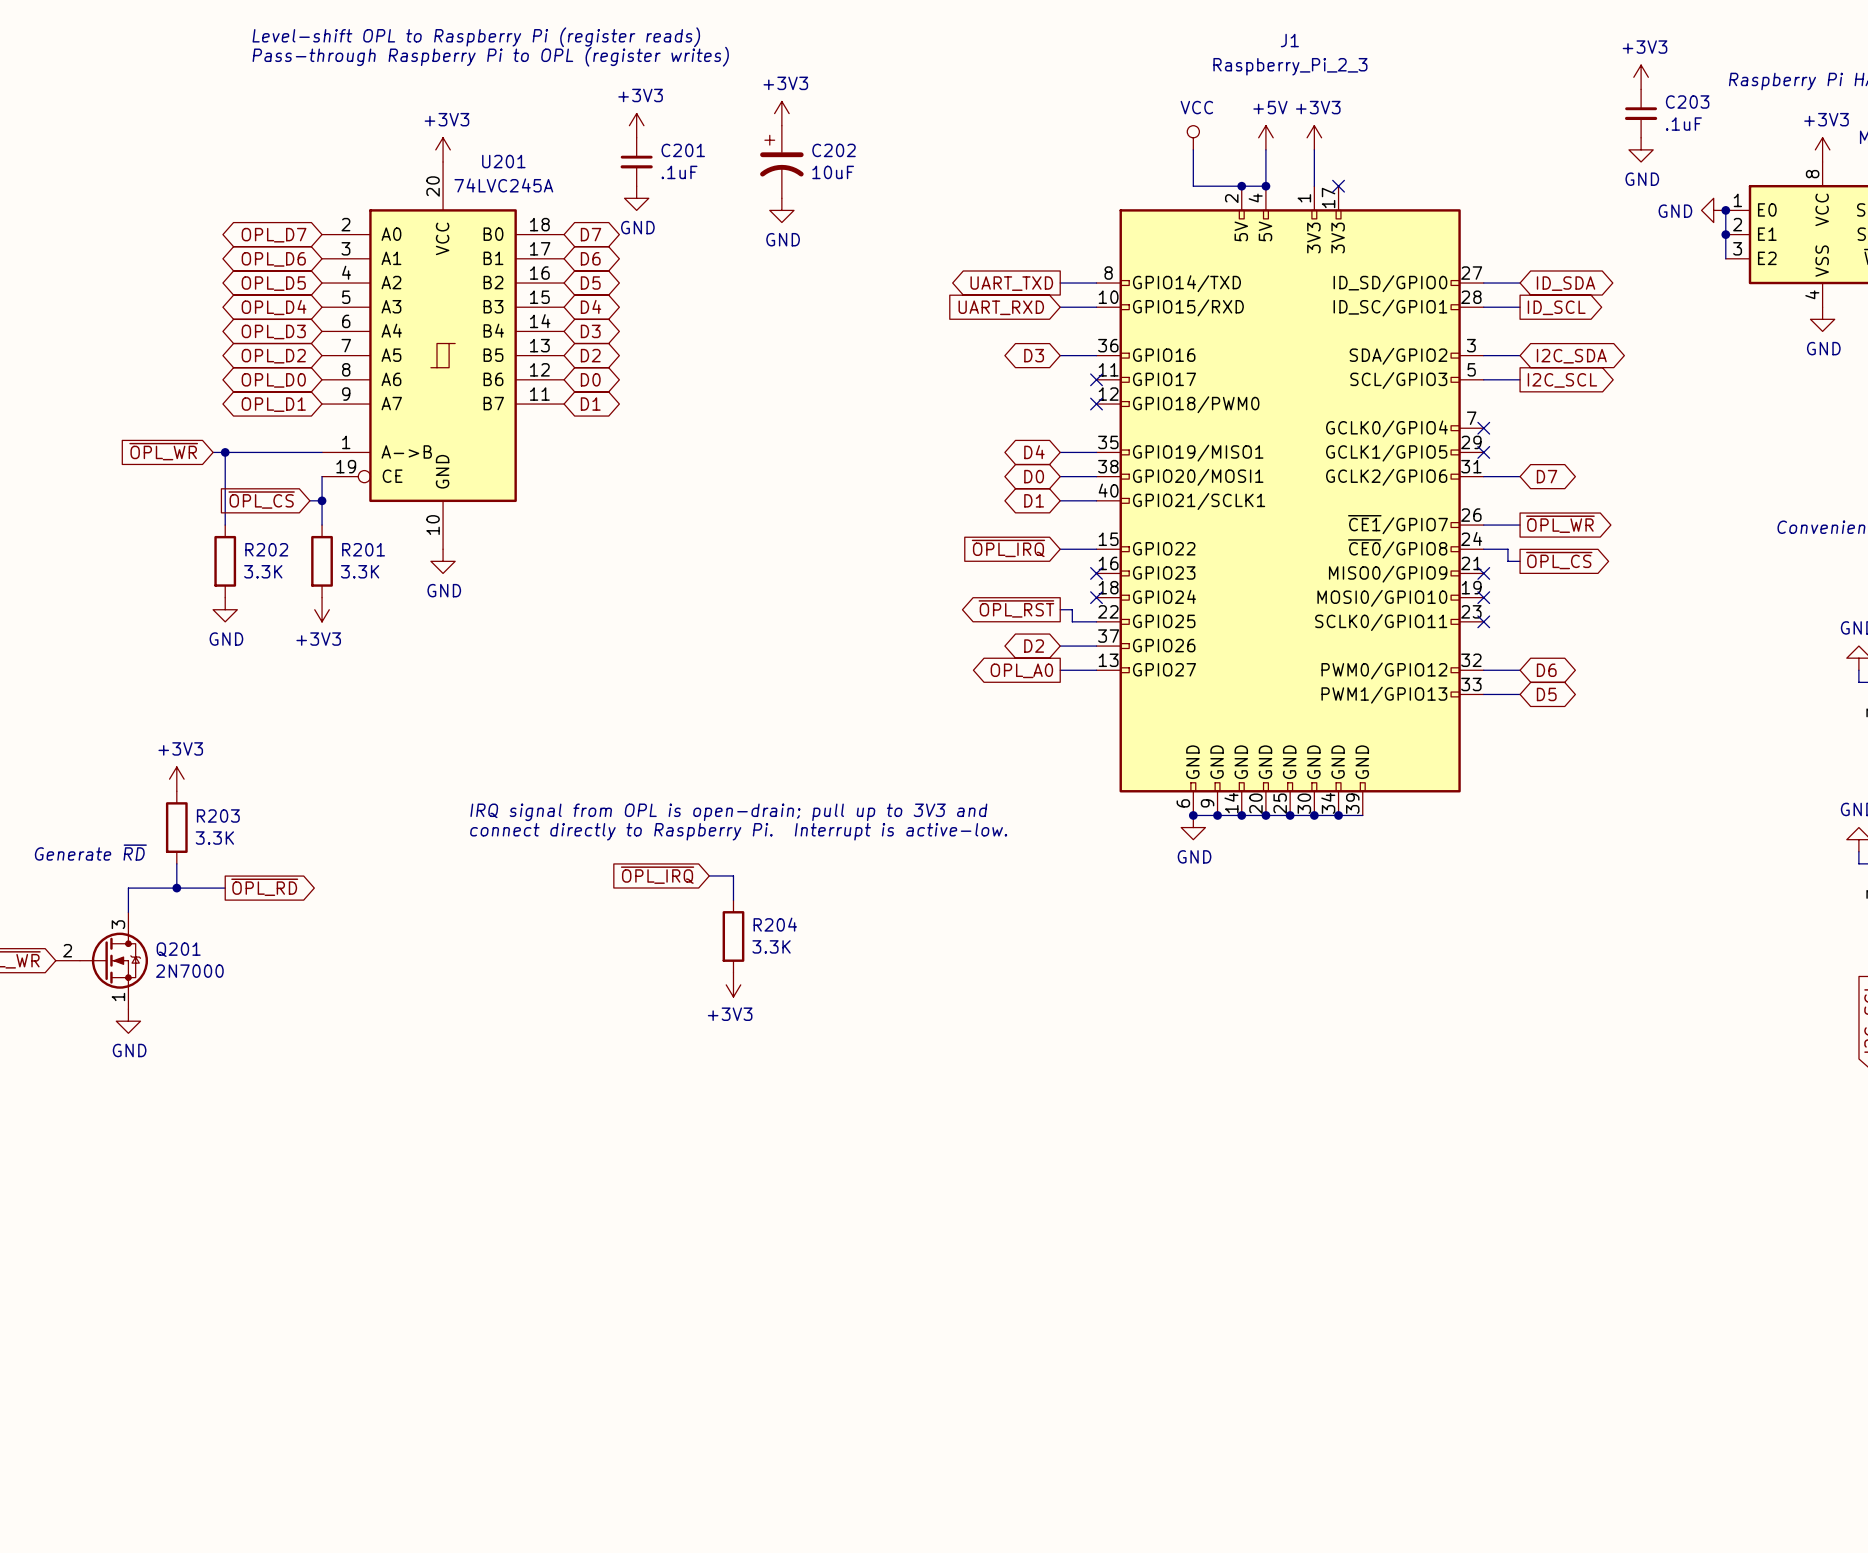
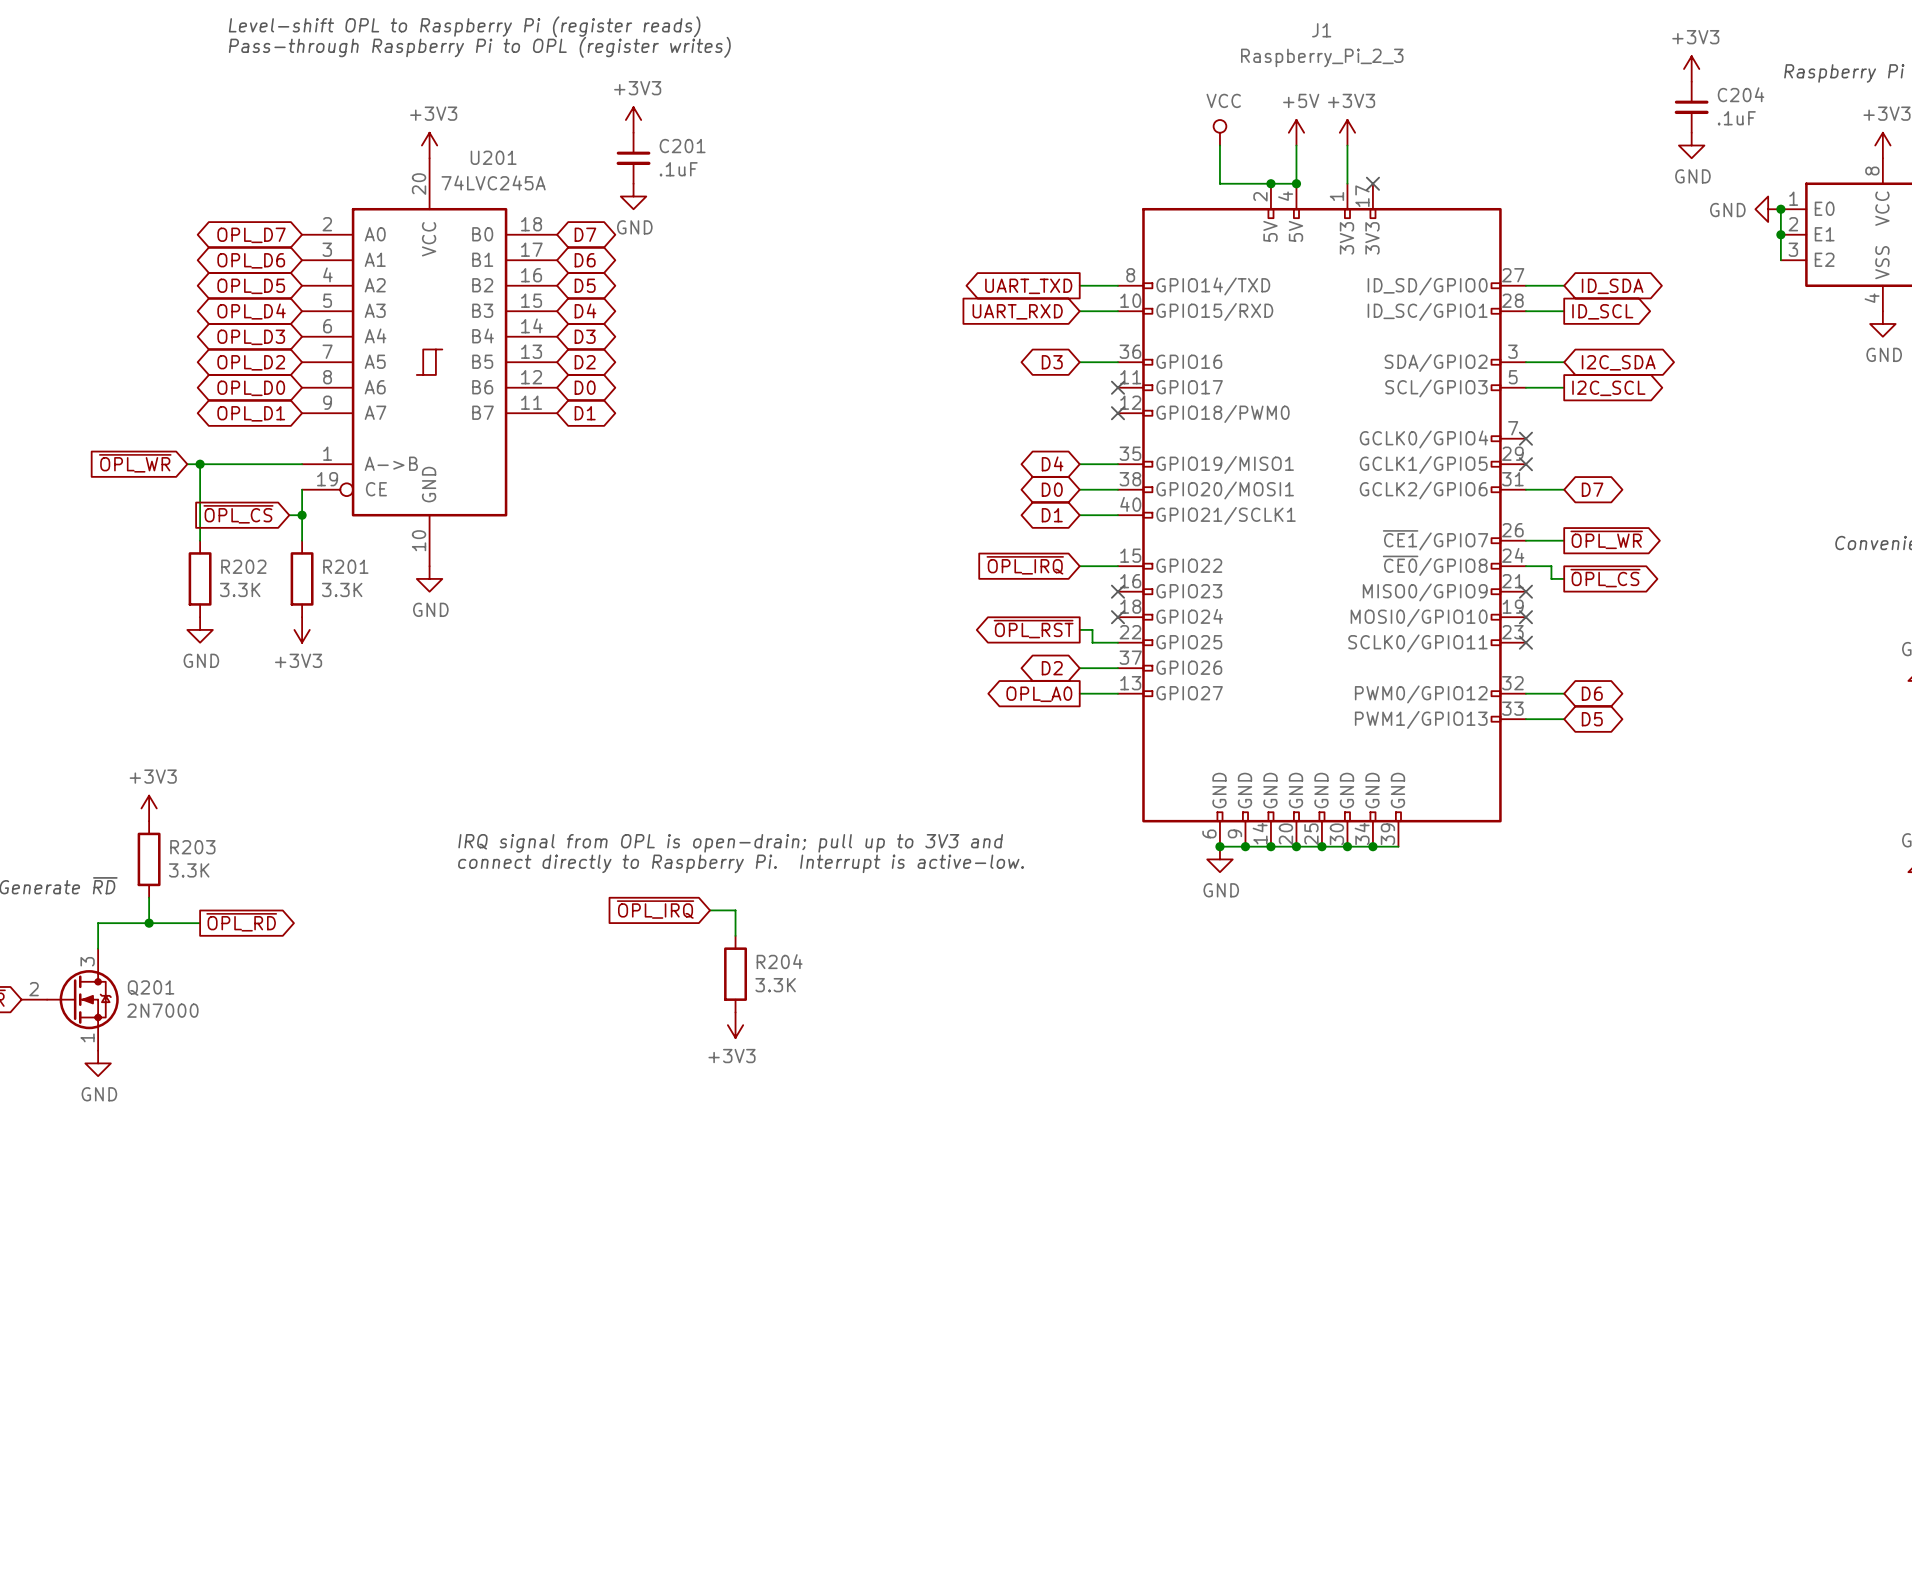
C203 name: C203 (1687, 102) -> C204 (1741, 94)
power symbol: +3V3 (781, 113) -> none
C202: 10uF (781, 161) -> none
power symbol: GND (781, 210) -> none

